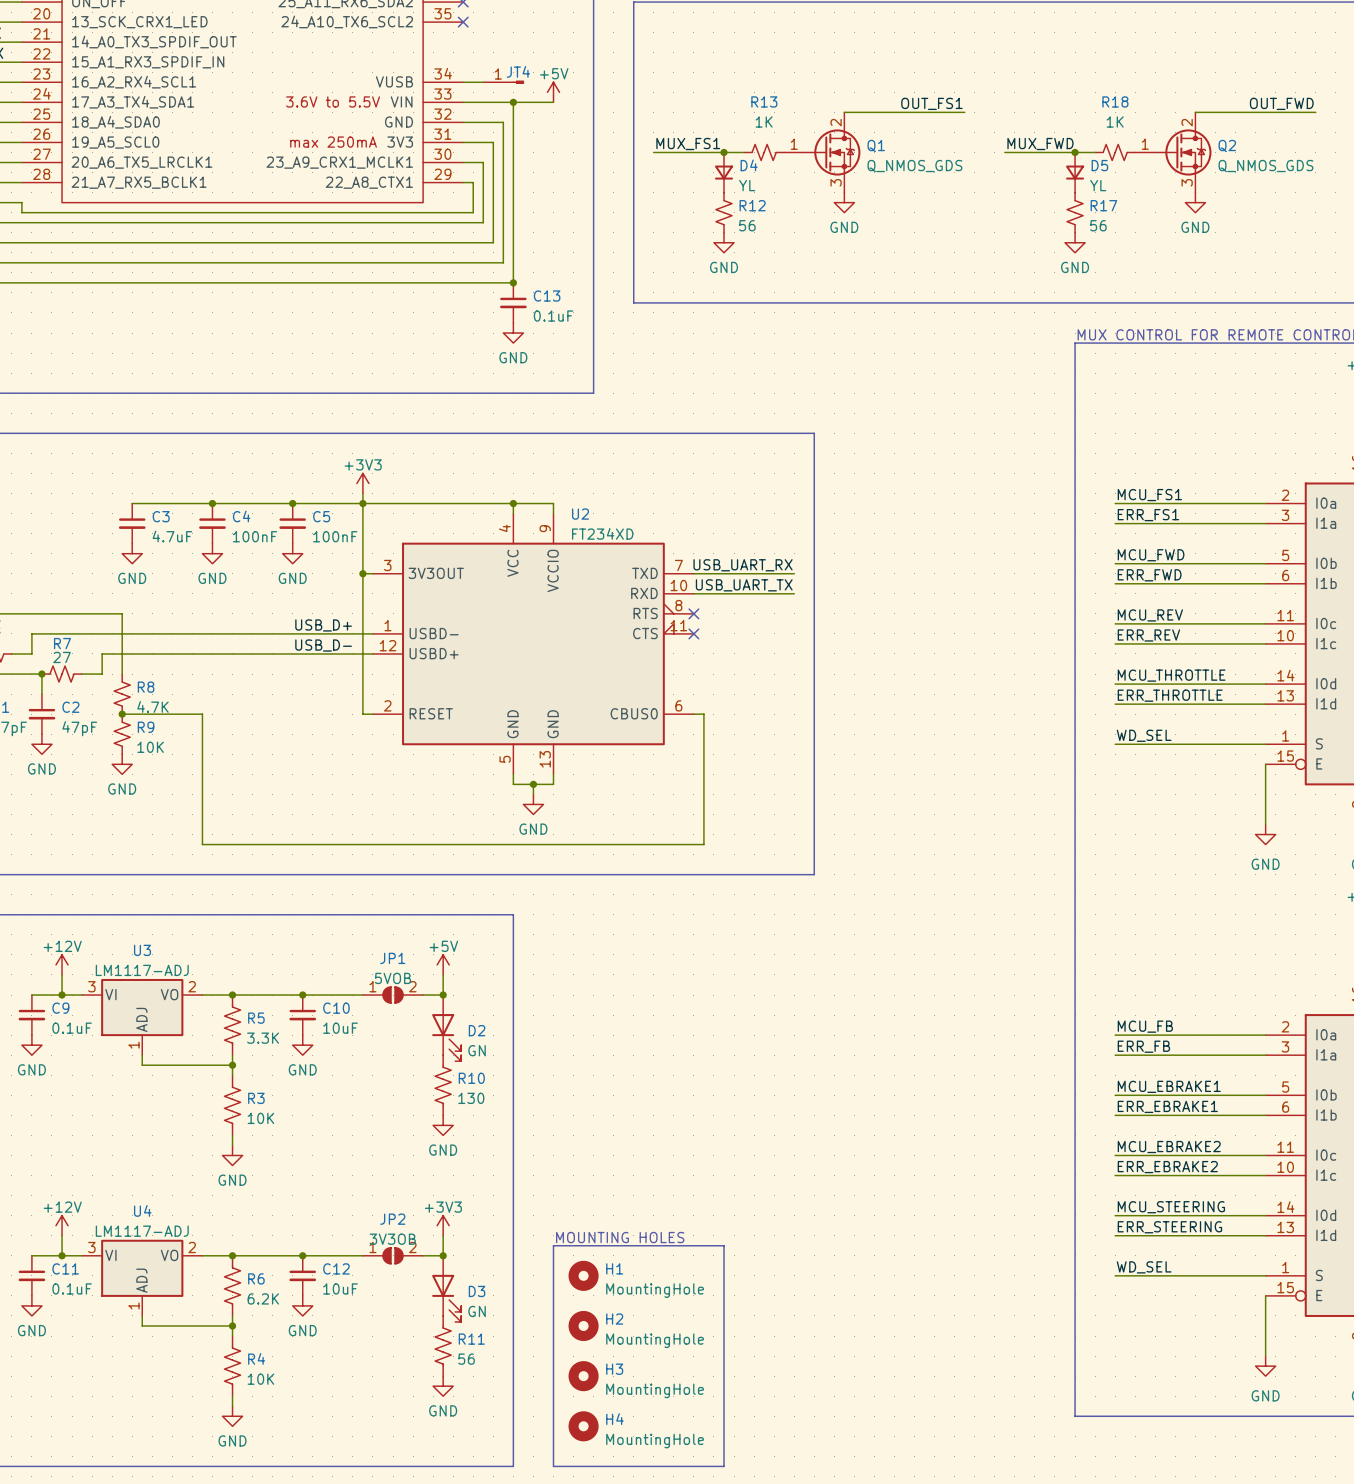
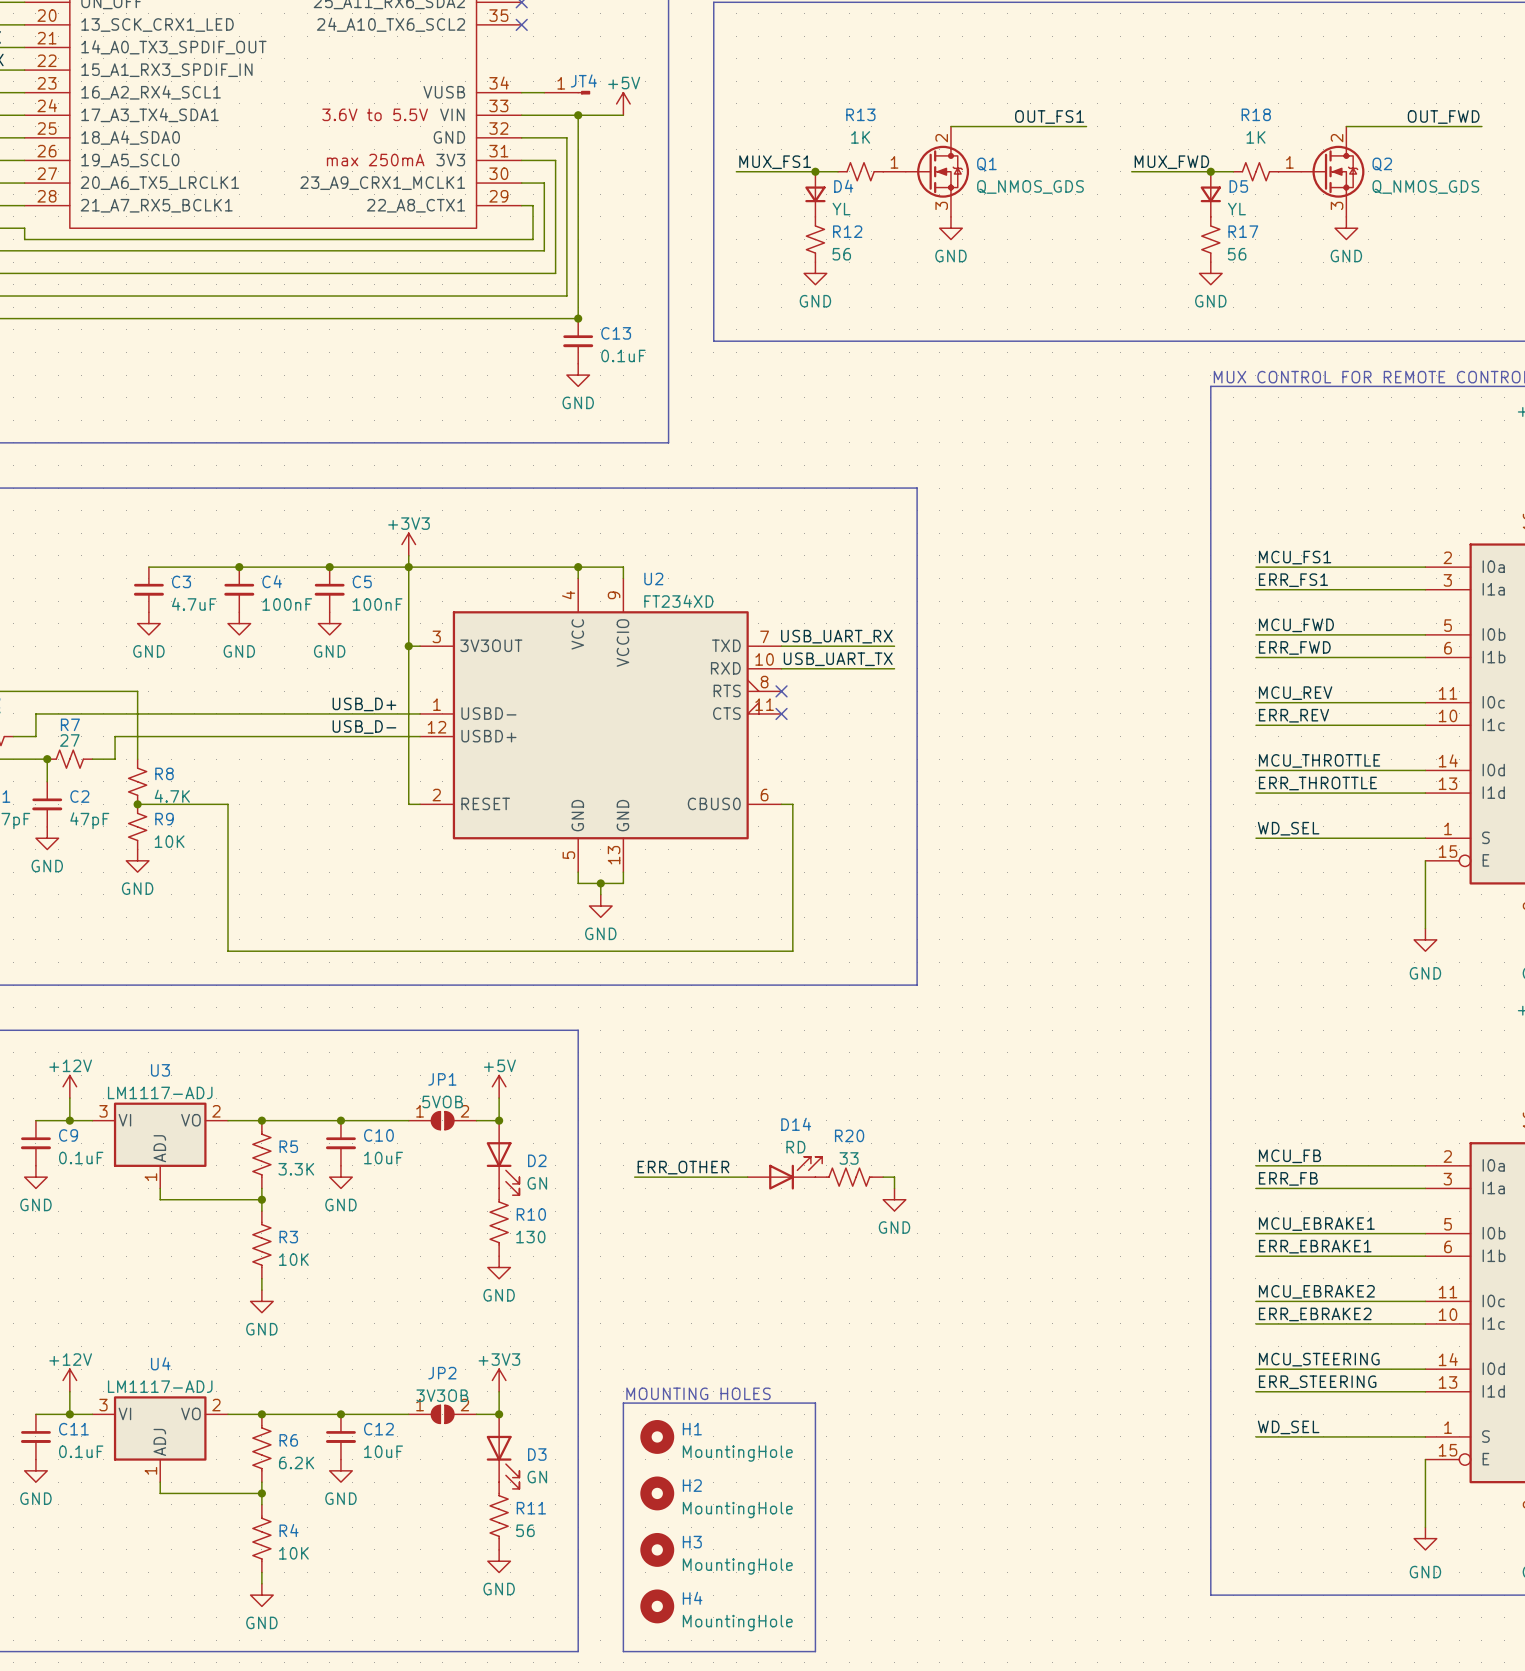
label: none -> ERR_OTHER (683, 1167)
D14: none -> RD (784, 1173)
wire: none -> (634, 1177) (747, 1177)
R20: none -> 33 (849, 1177)
wire: none -> (883, 1177) (894, 1177) (894, 1188)
power symbol: none -> GND (894, 1199)

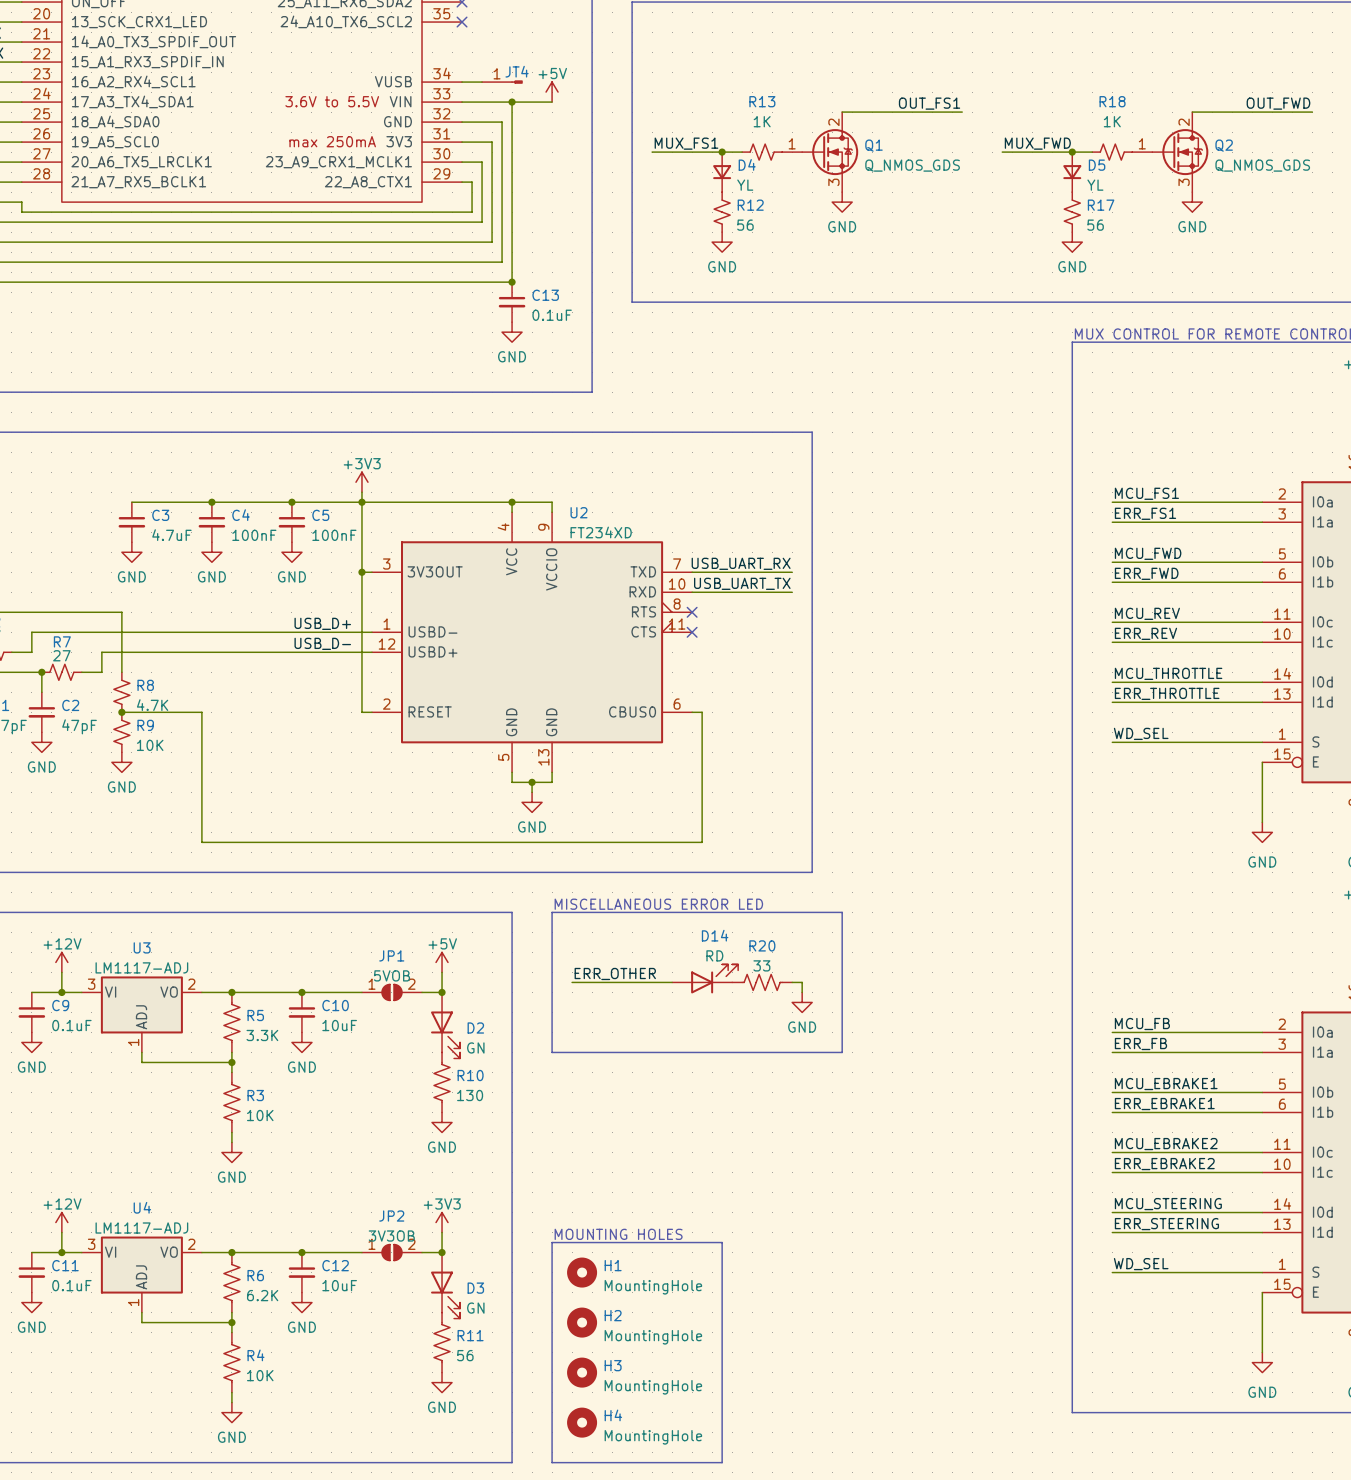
text: none -> MISCELLANEOUS ERROR LED (658, 904)
line: none -> (552, 912) (552, 1052) (842, 1052) (842, 912) (552, 912)
label position: ERR_OTHER (683, 1167) -> ERR_OTHER (615, 973)
D14 position: (784, 1173) -> (705, 978)
wire: (634, 1177) (747, 1177) -> (572, 982) (672, 982)
R20 position: (849, 1177) -> (762, 982)
wire: (883, 1177) (894, 1177) (894, 1188) -> (792, 982) (802, 982) (802, 992)
power symbol position: GND (894, 1199) -> GND (802, 1002)

